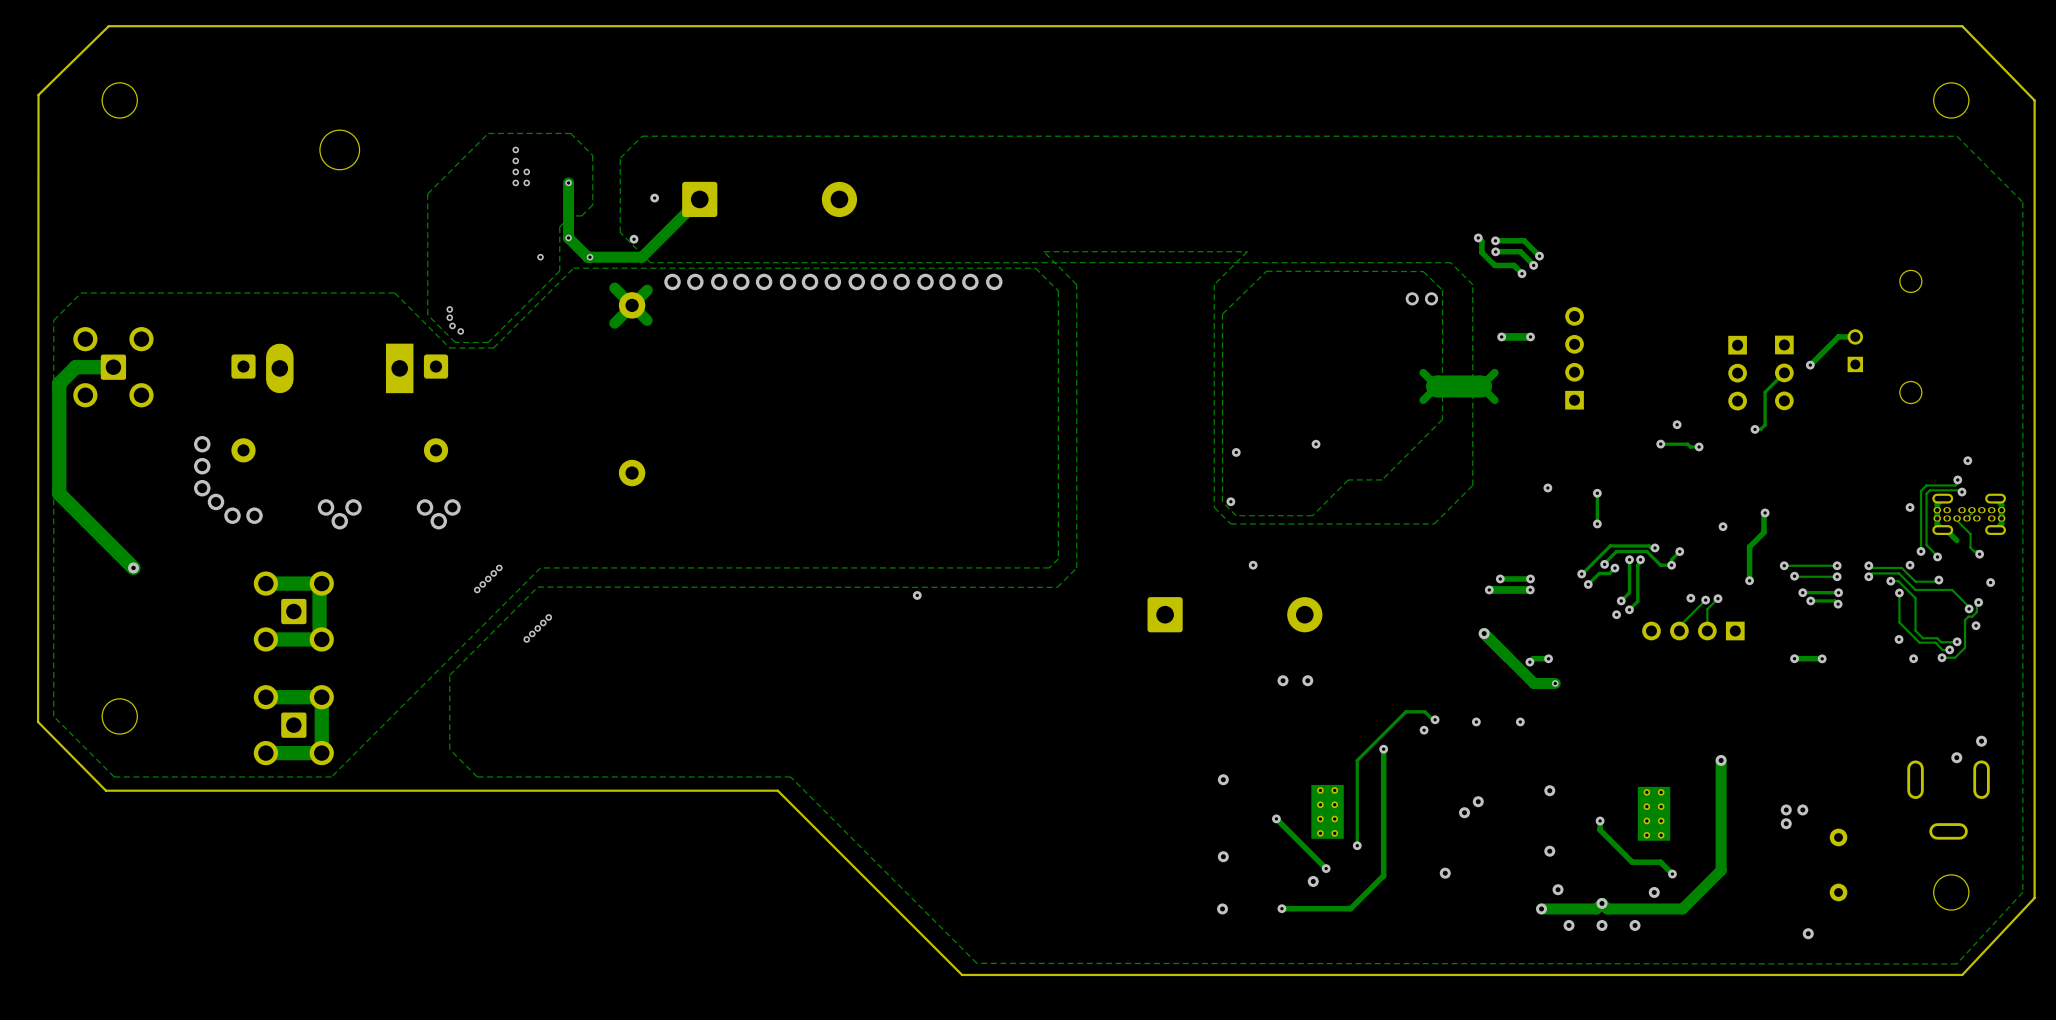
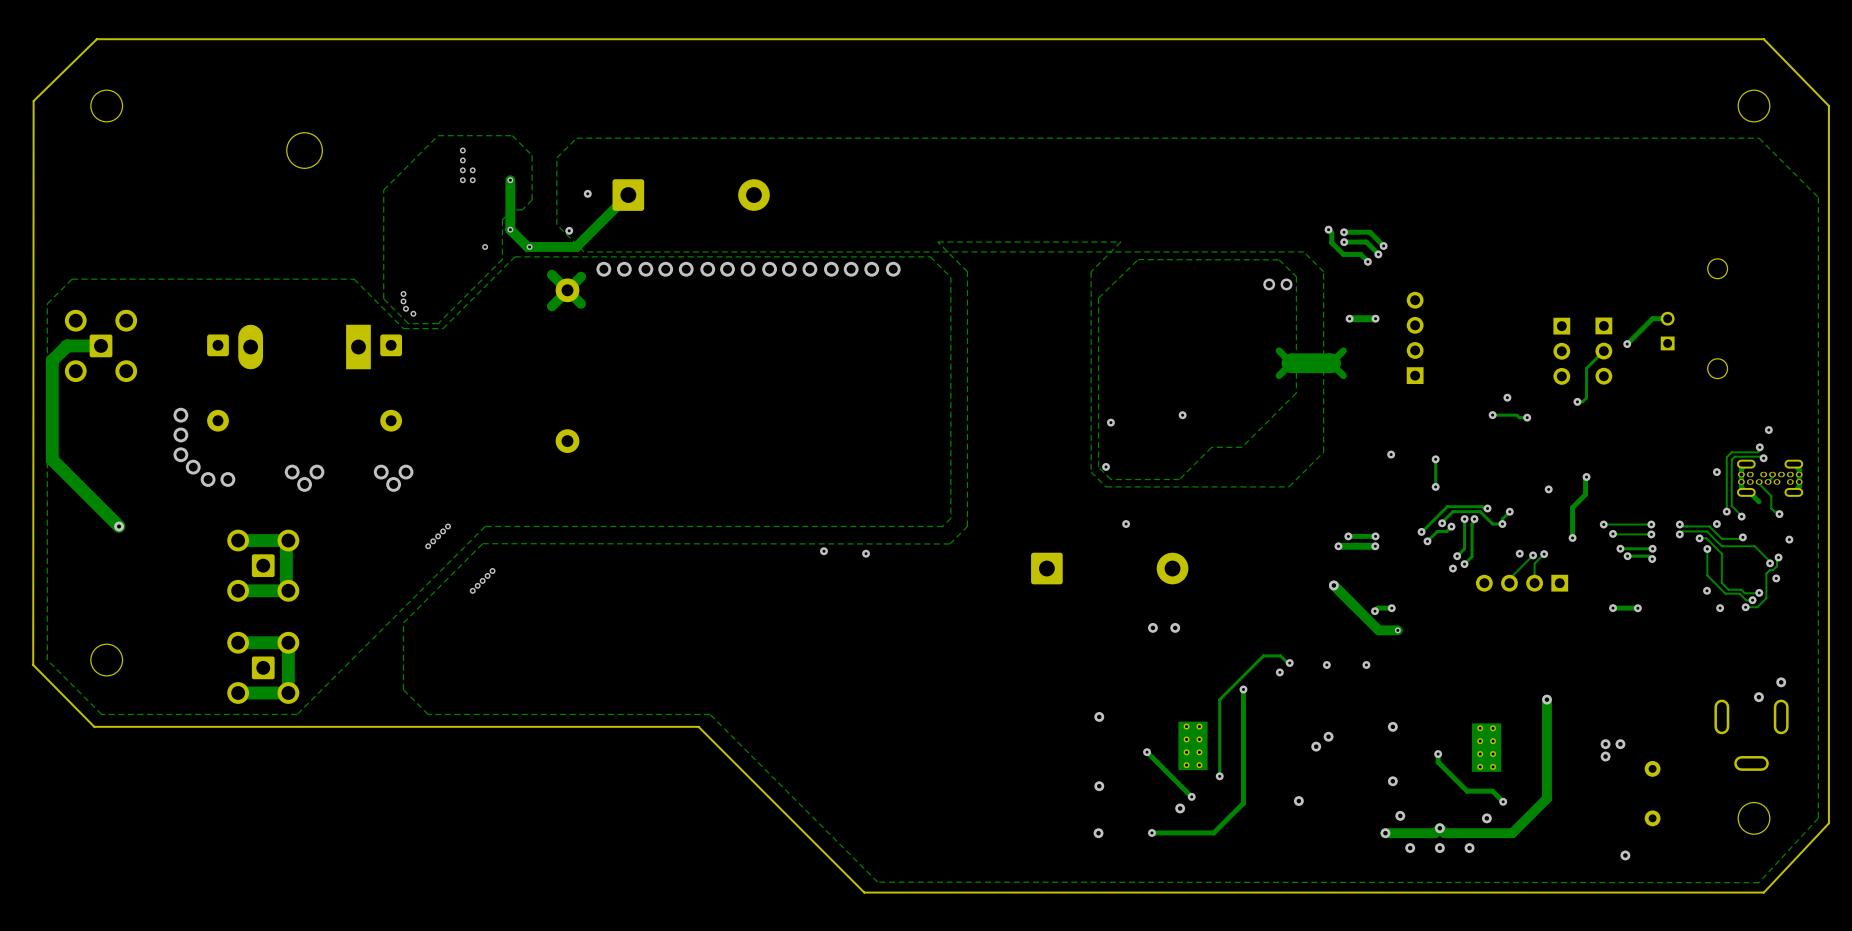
via: none -> (866, 553)

